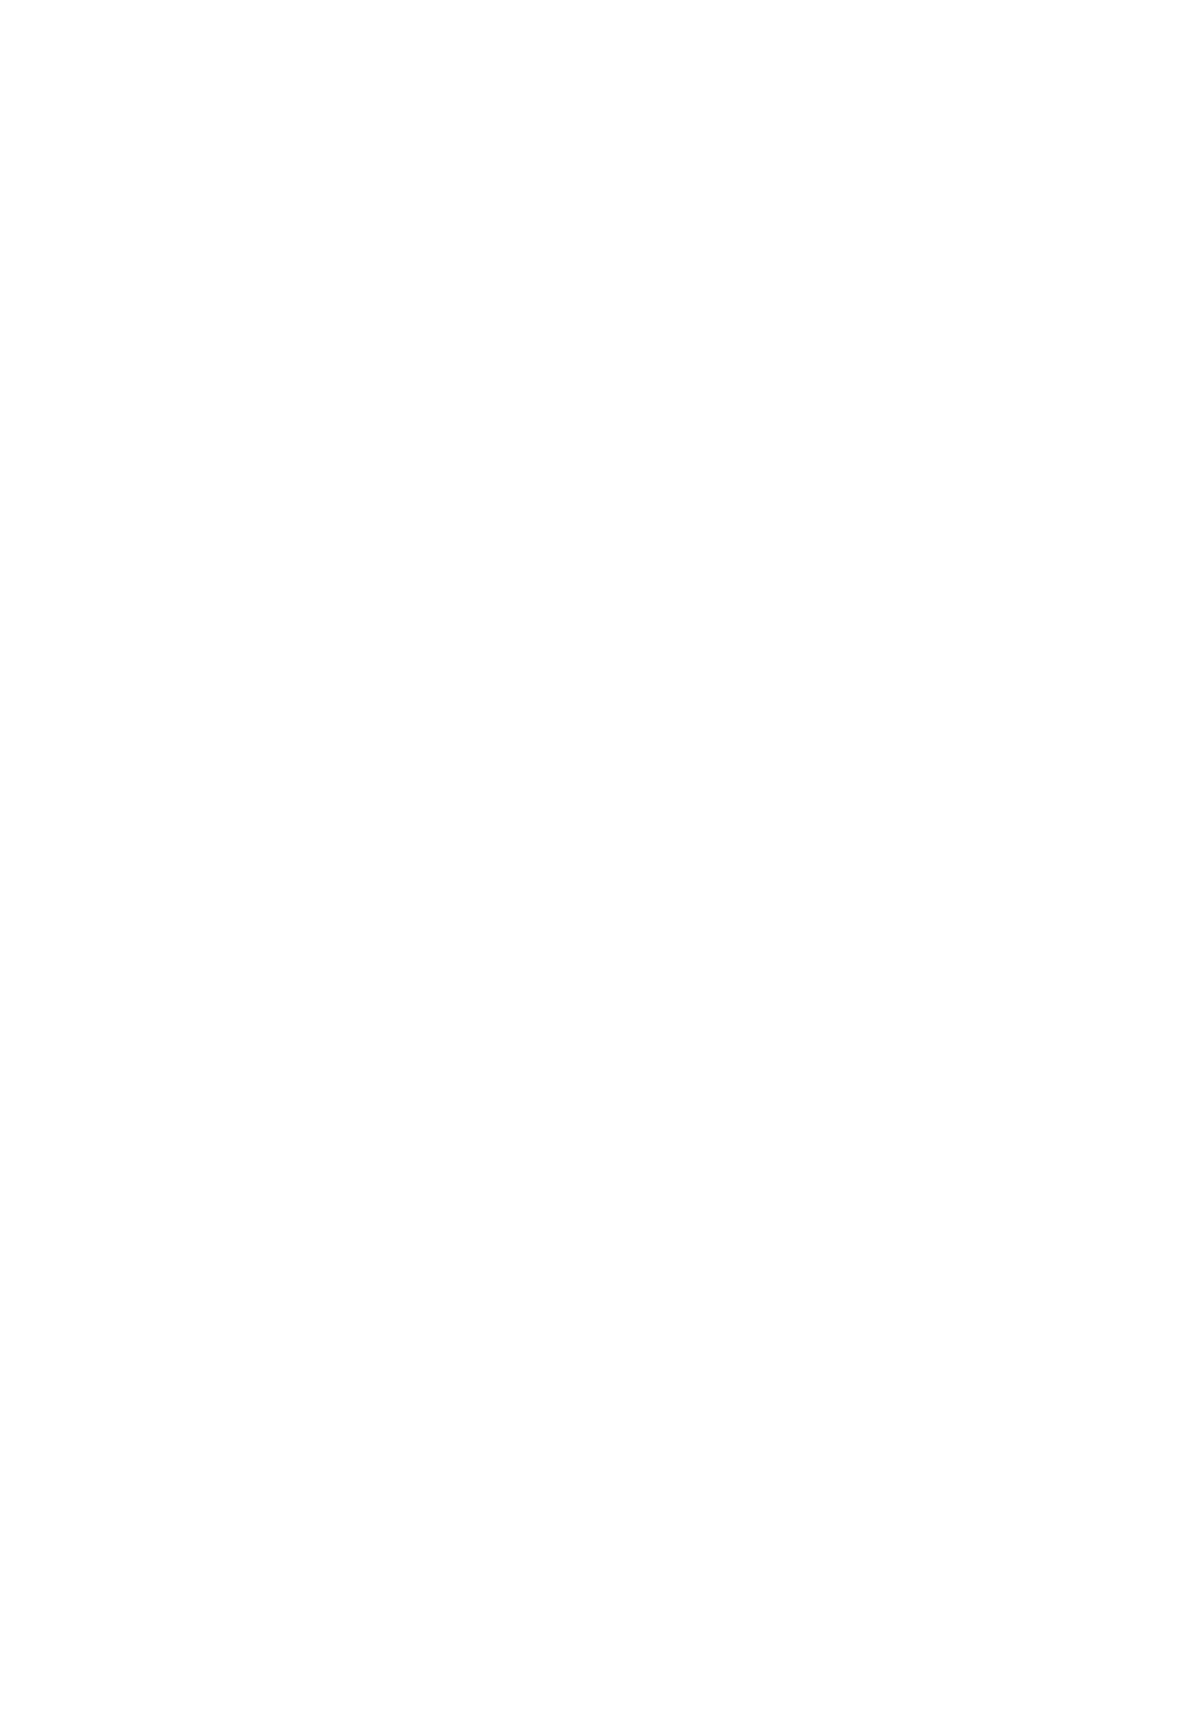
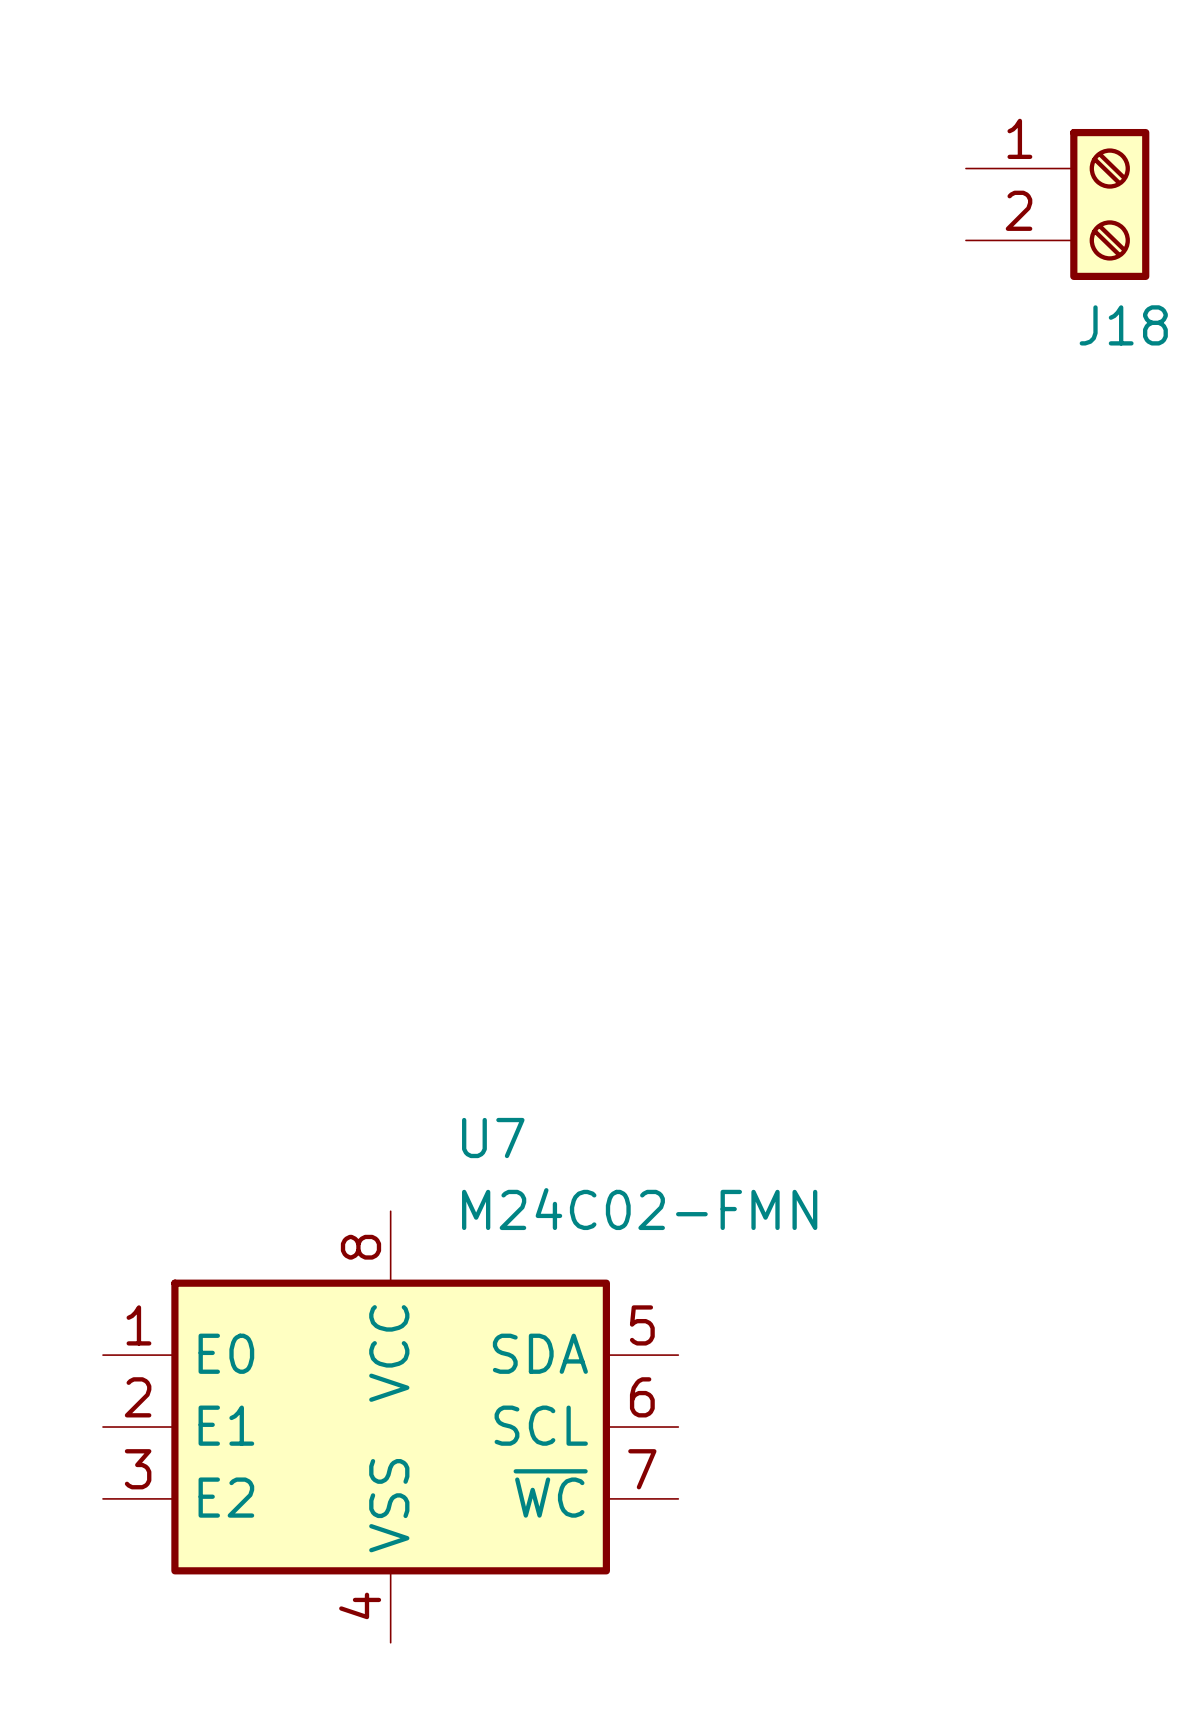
J18: none -> (1057, 204)
U7: none -> M24C02-FMN (390, 1427)

